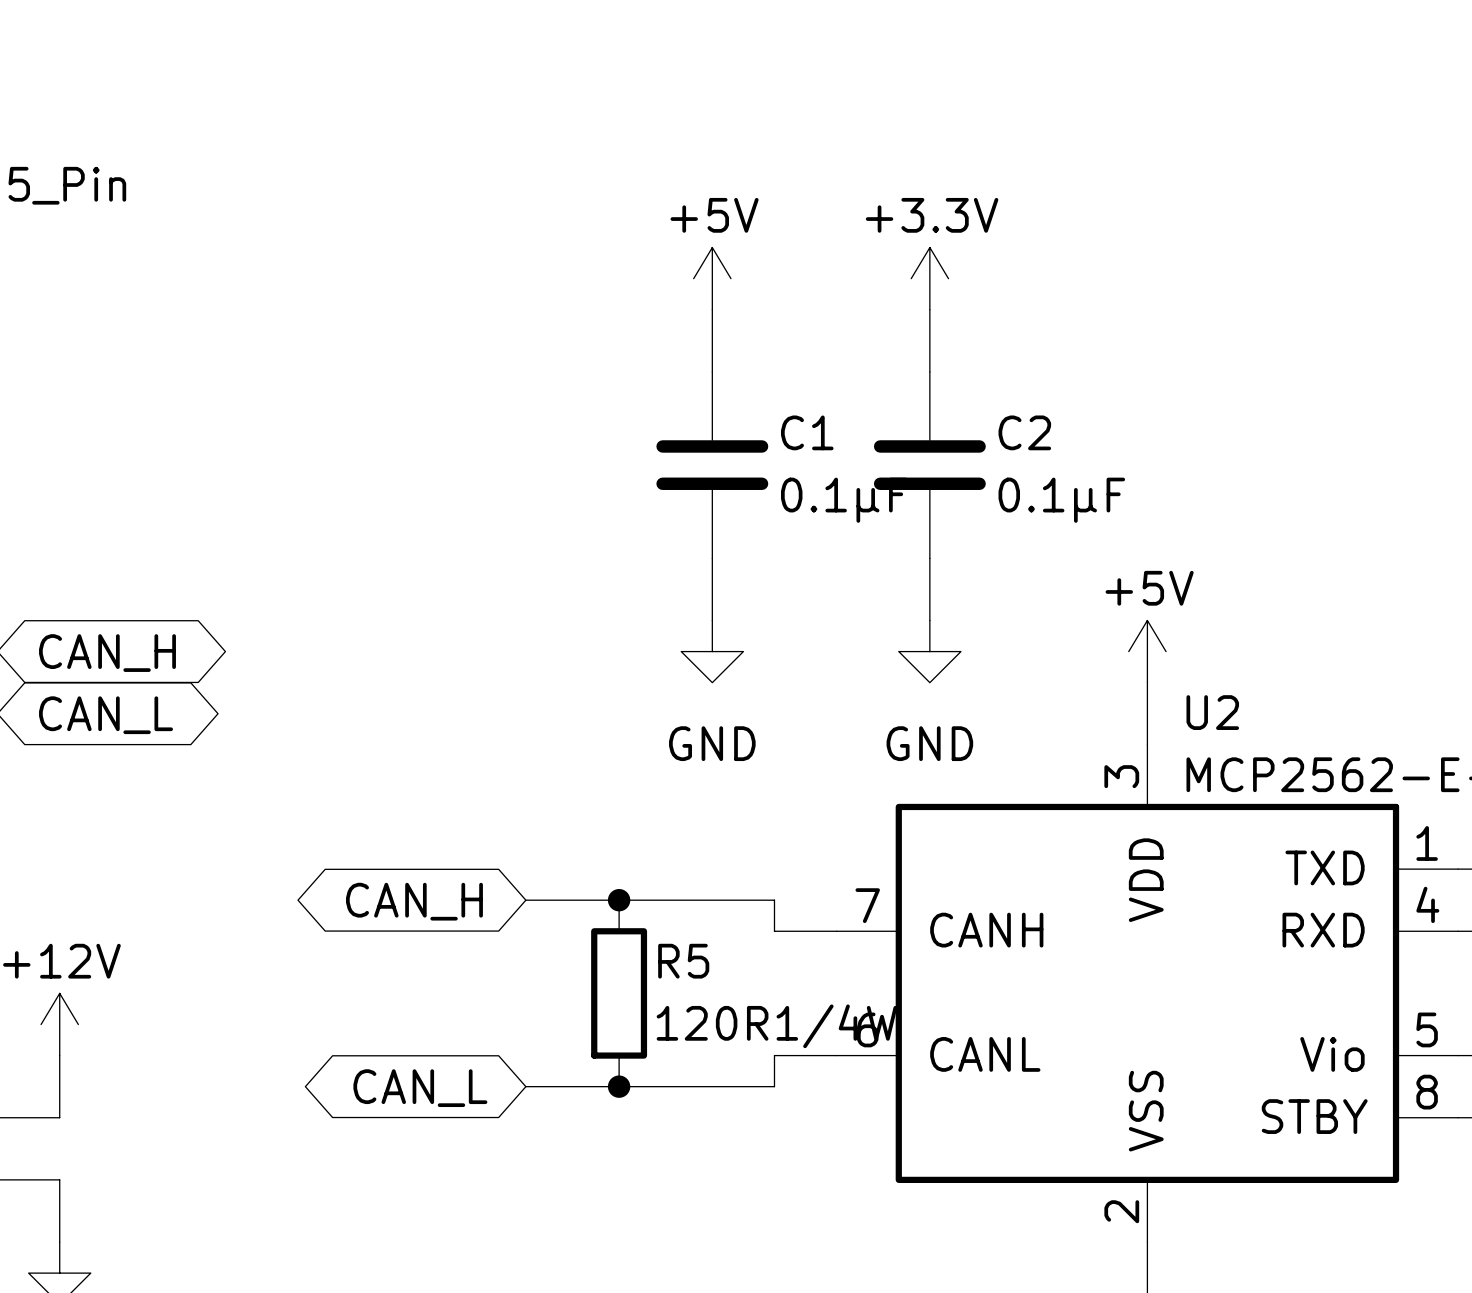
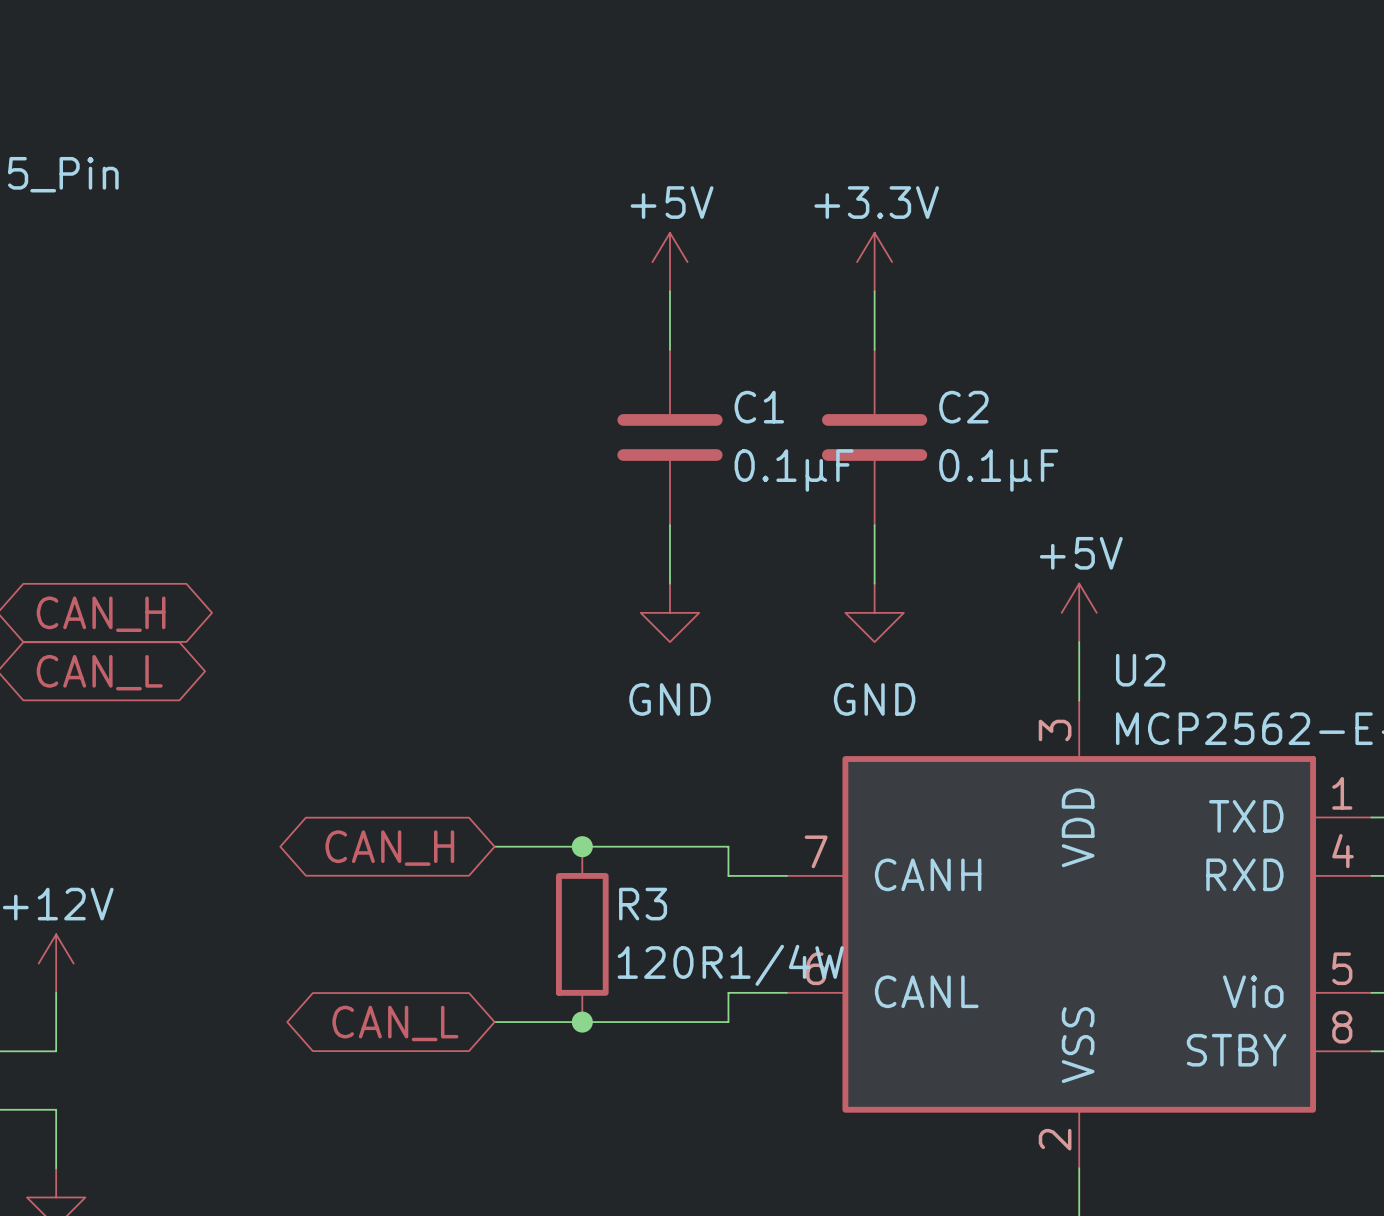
R5 name: R5 (683, 961) -> R3 (643, 904)

